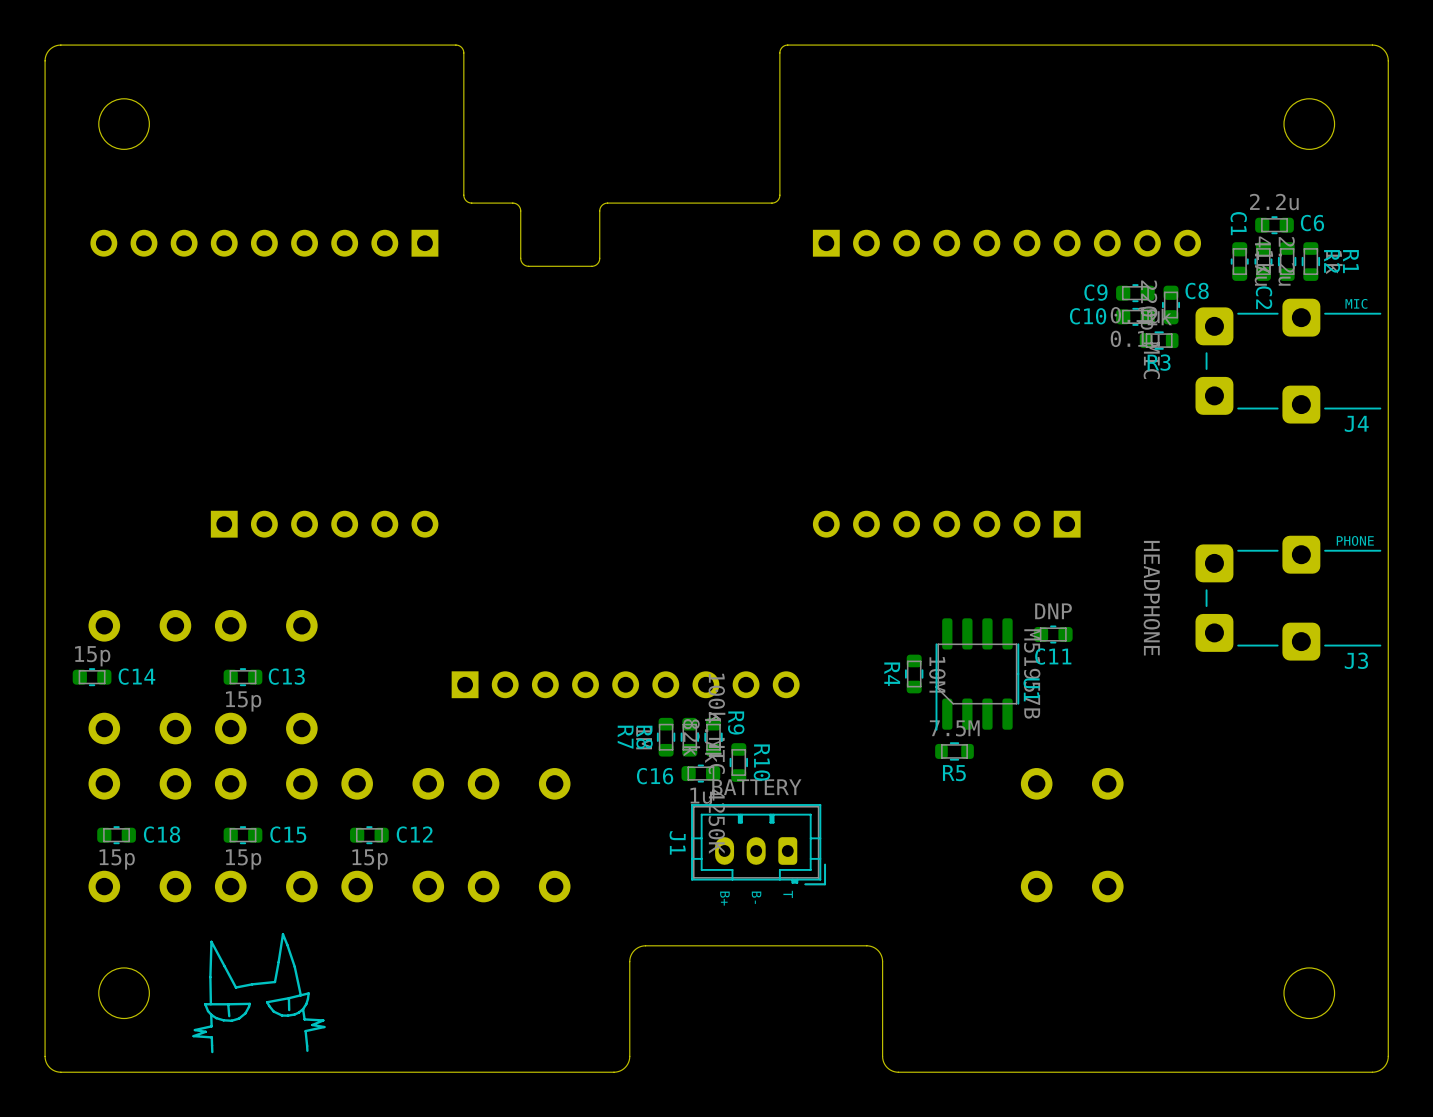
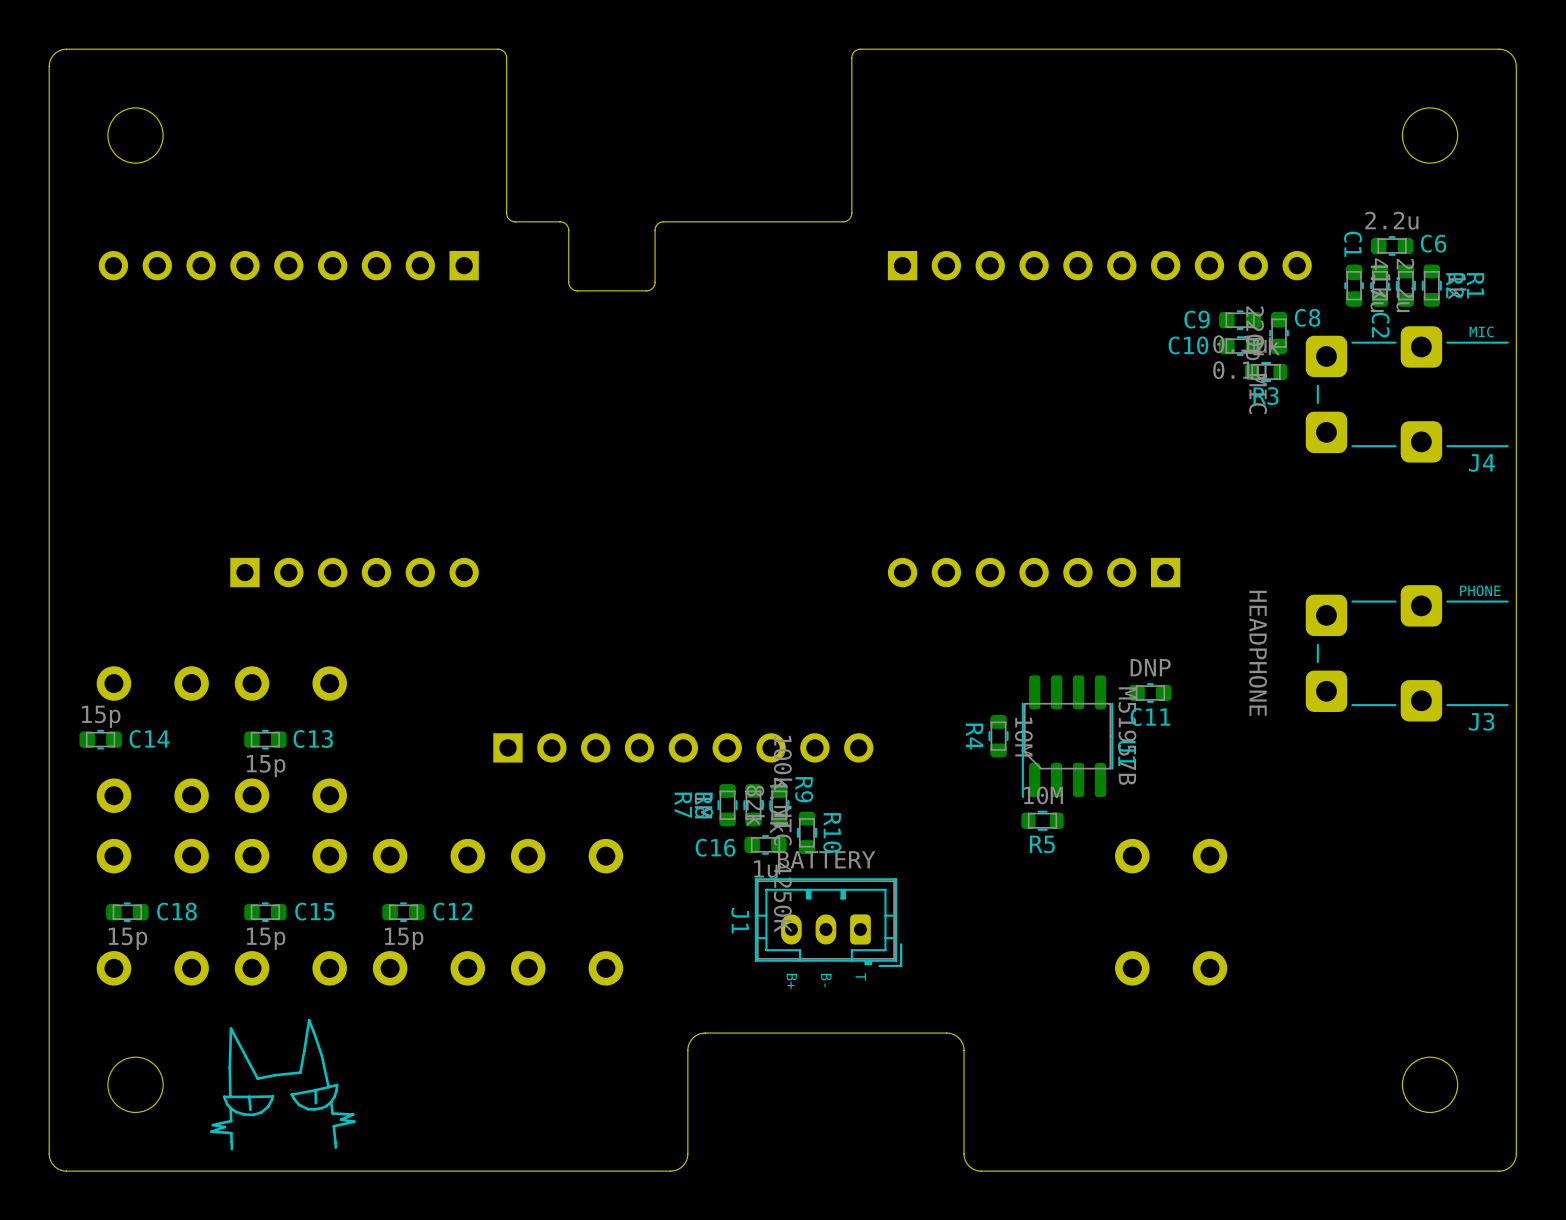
R5 value: 7.5M (954, 728) -> 10M (1043, 795)

